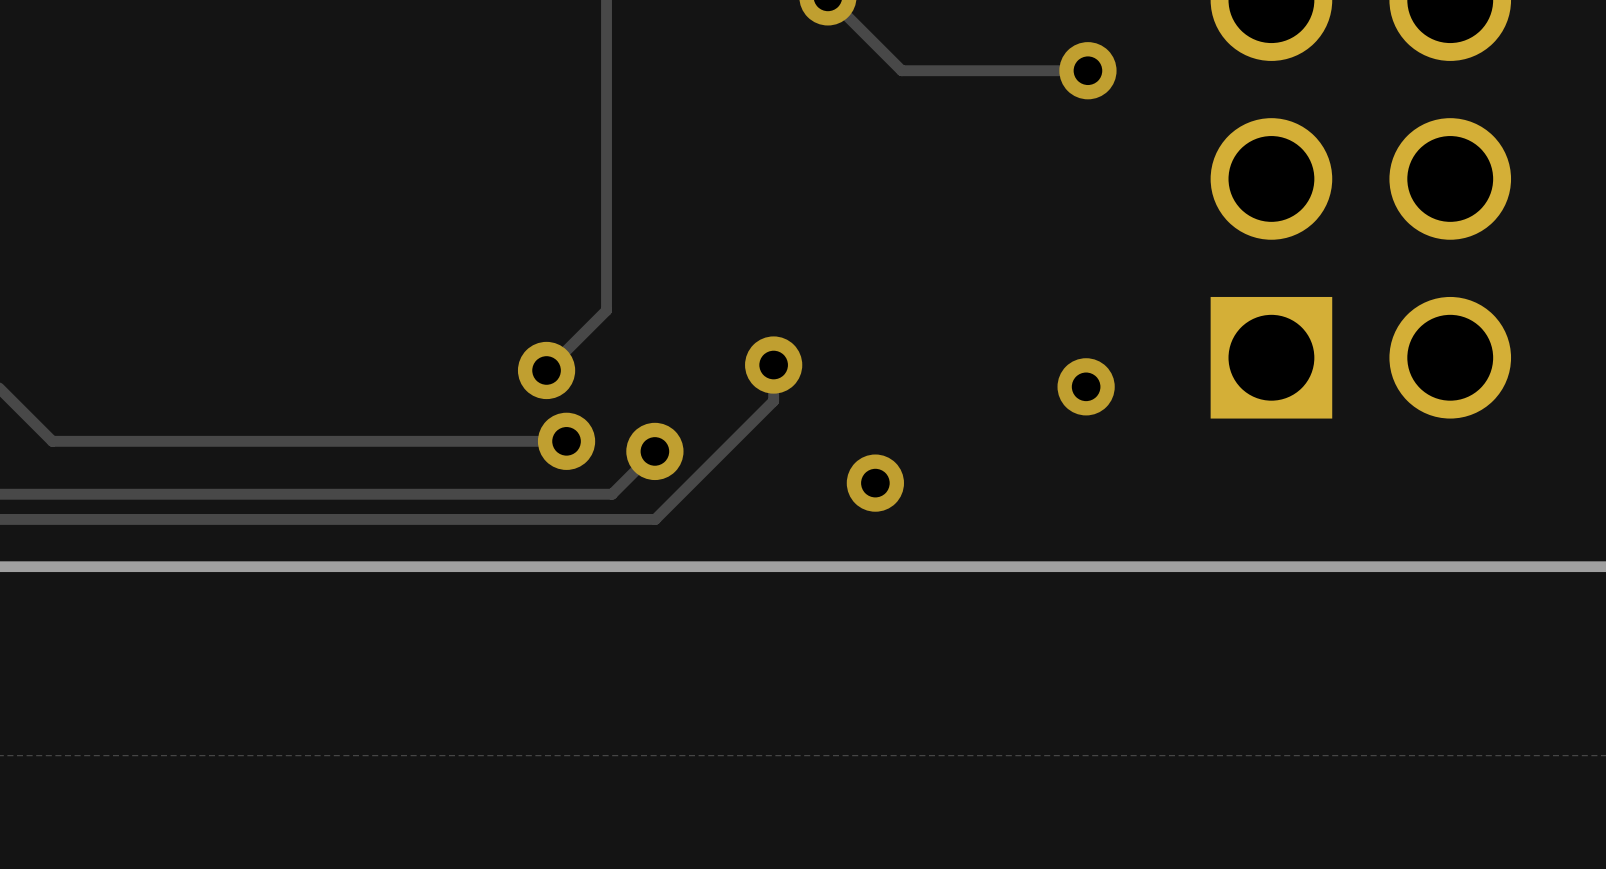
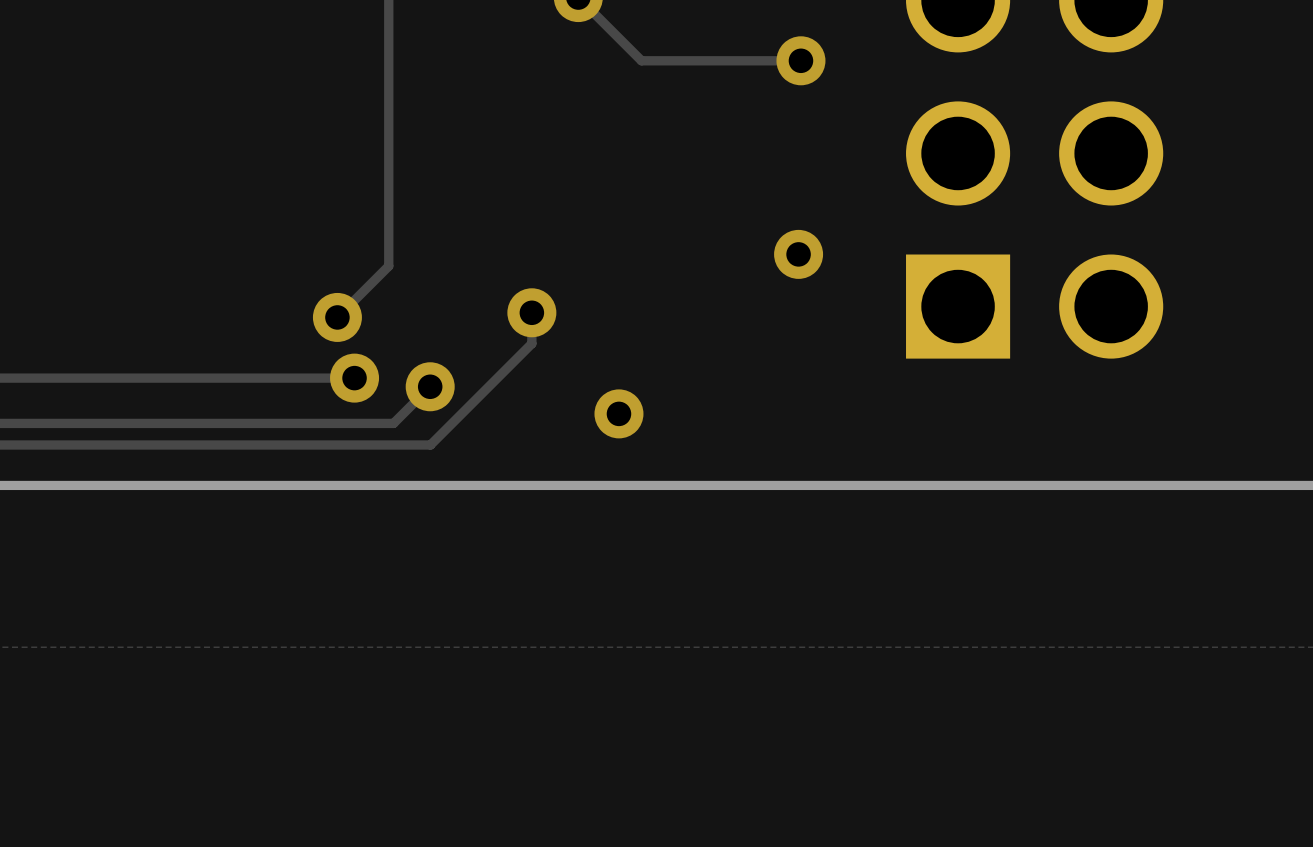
via position: (1086, 386) -> (798, 254)

